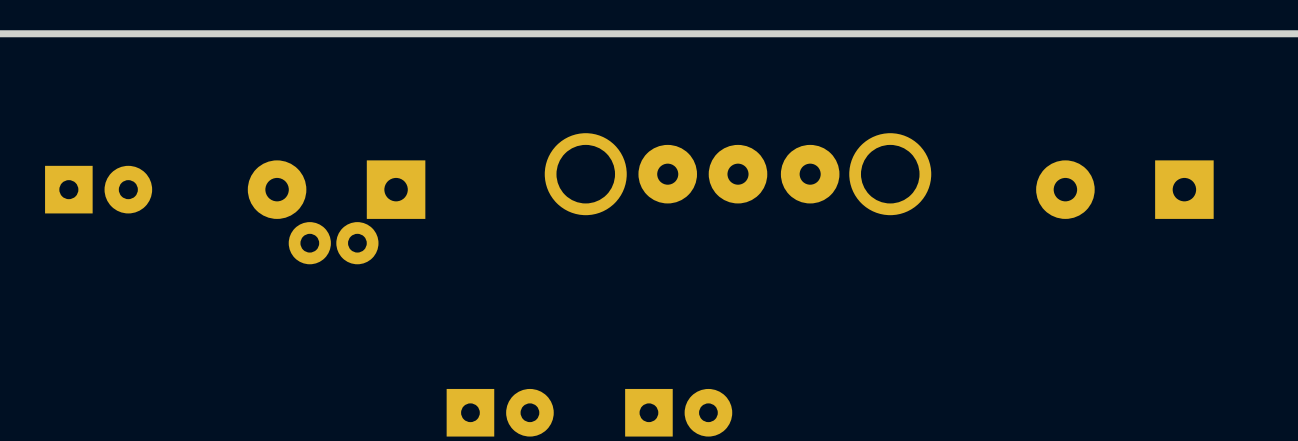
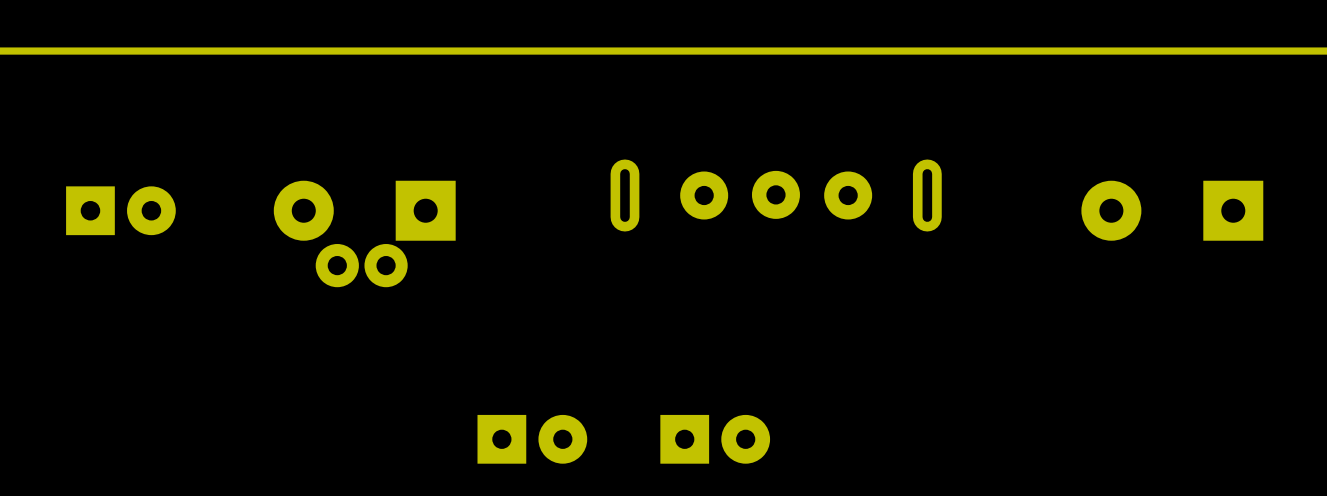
part footprint: [544, 133, 932, 216] -> [610, 159, 942, 232]

